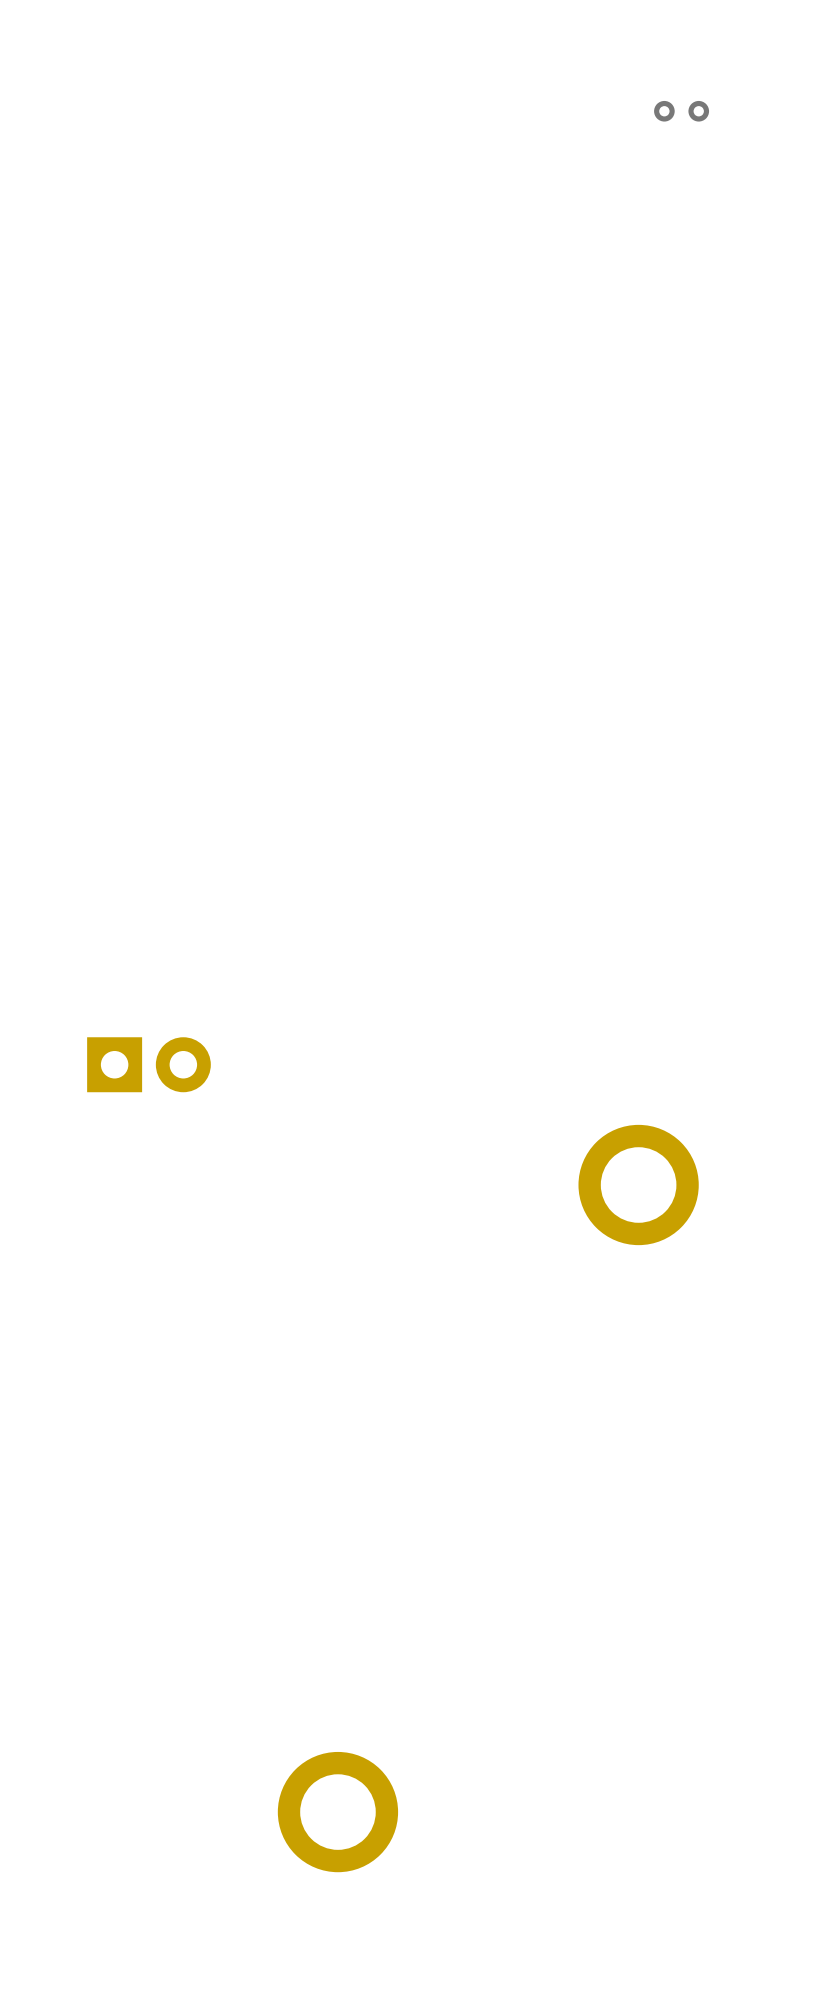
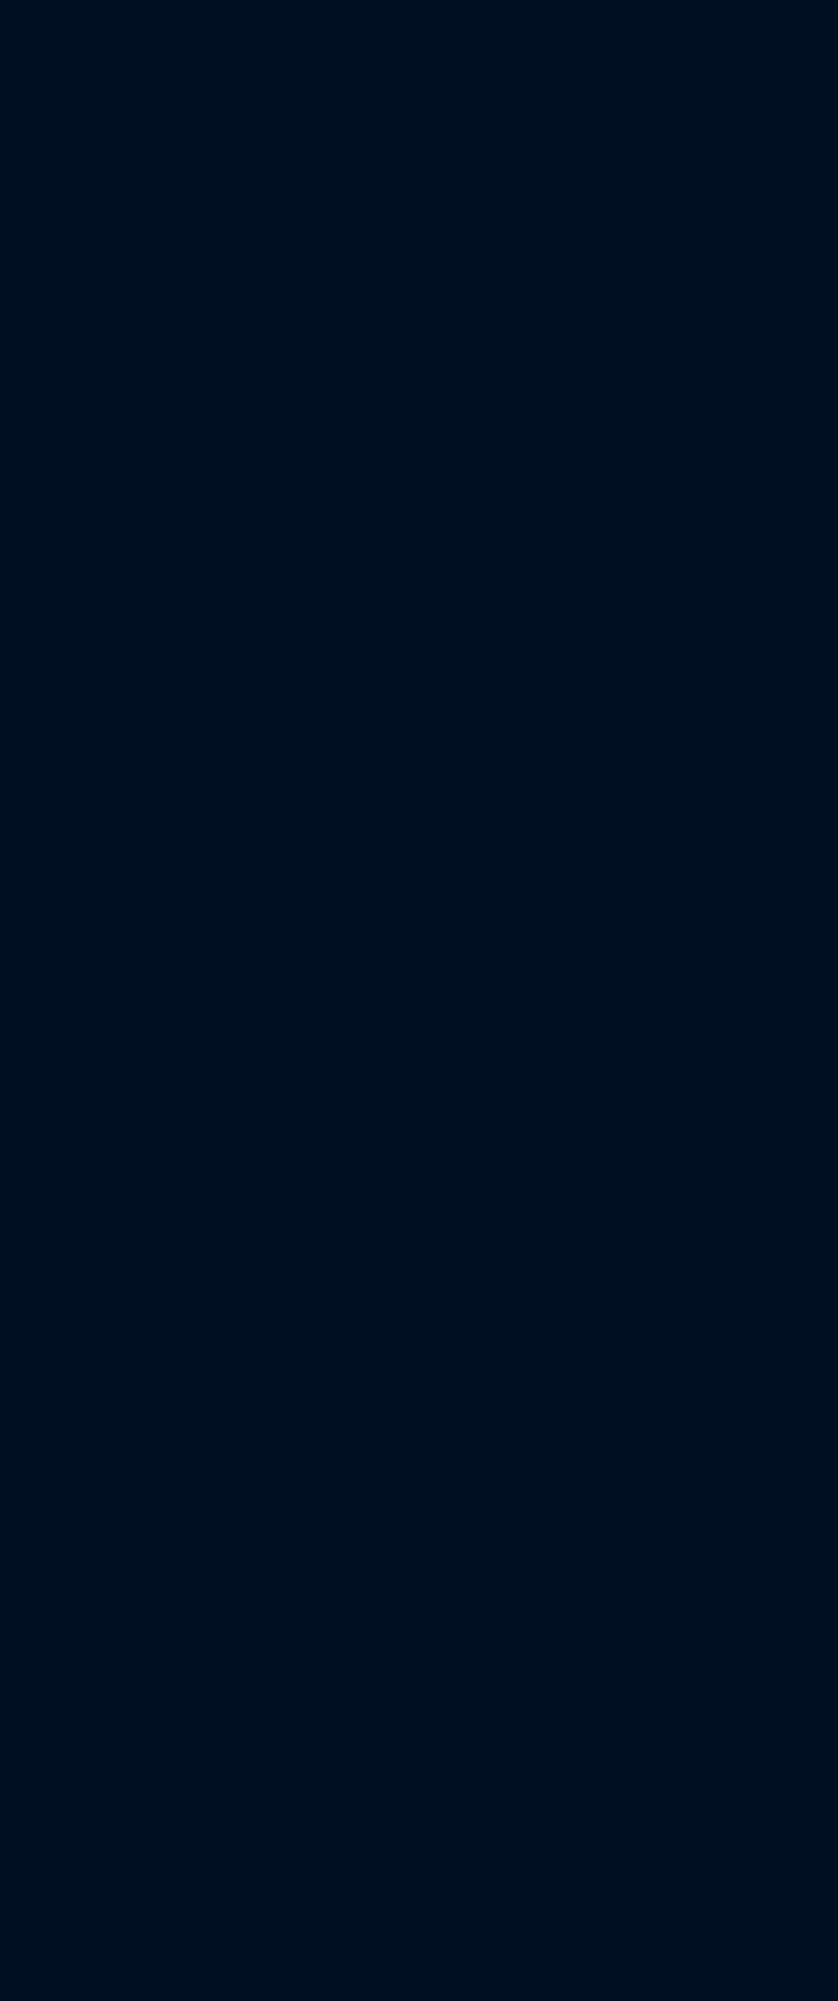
via: (664, 111) -> none
via: (698, 111) -> none
part: (148, 1064) -> none
part: (638, 1185) -> none
part: (337, 1812) -> none

